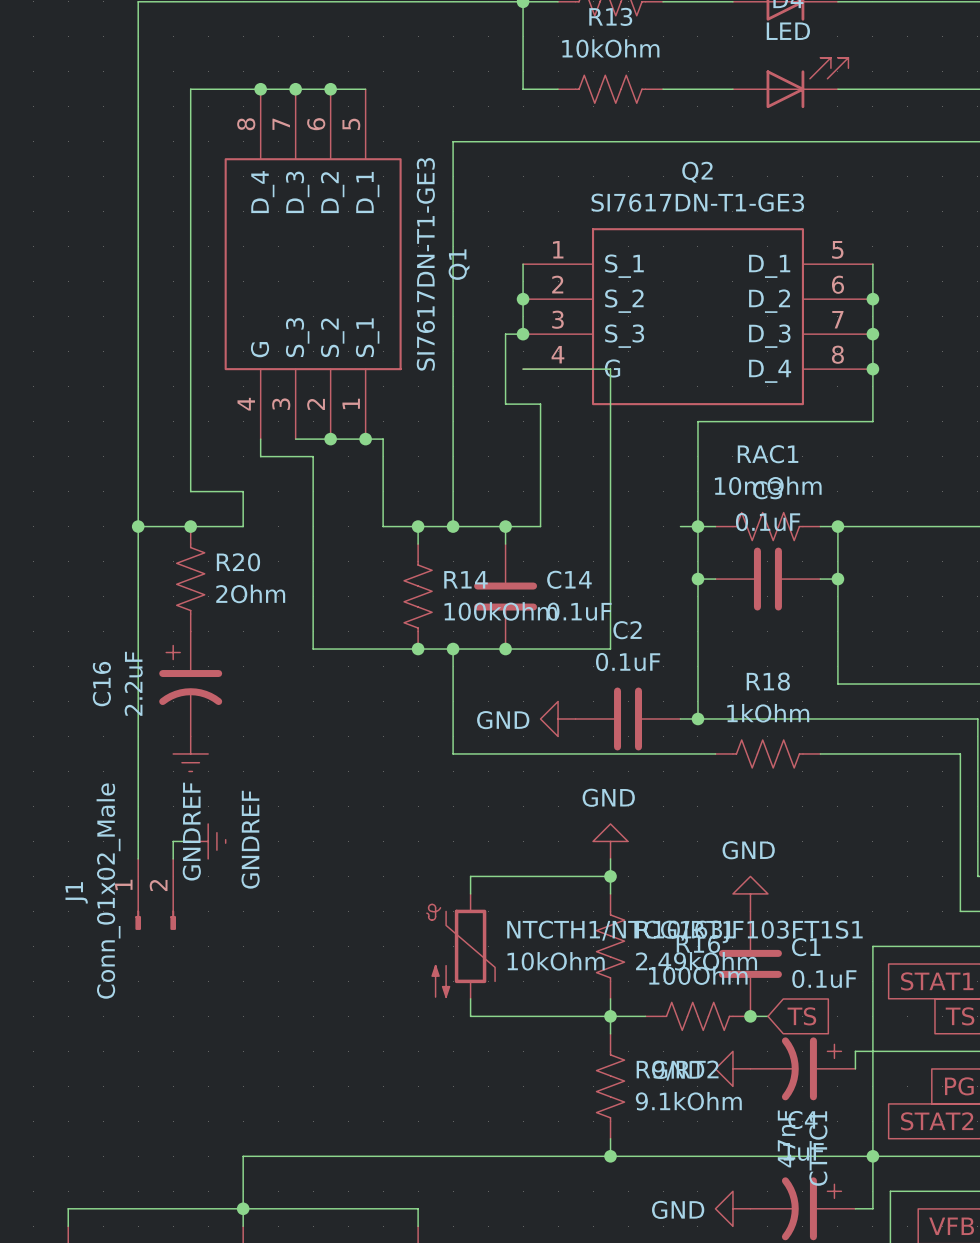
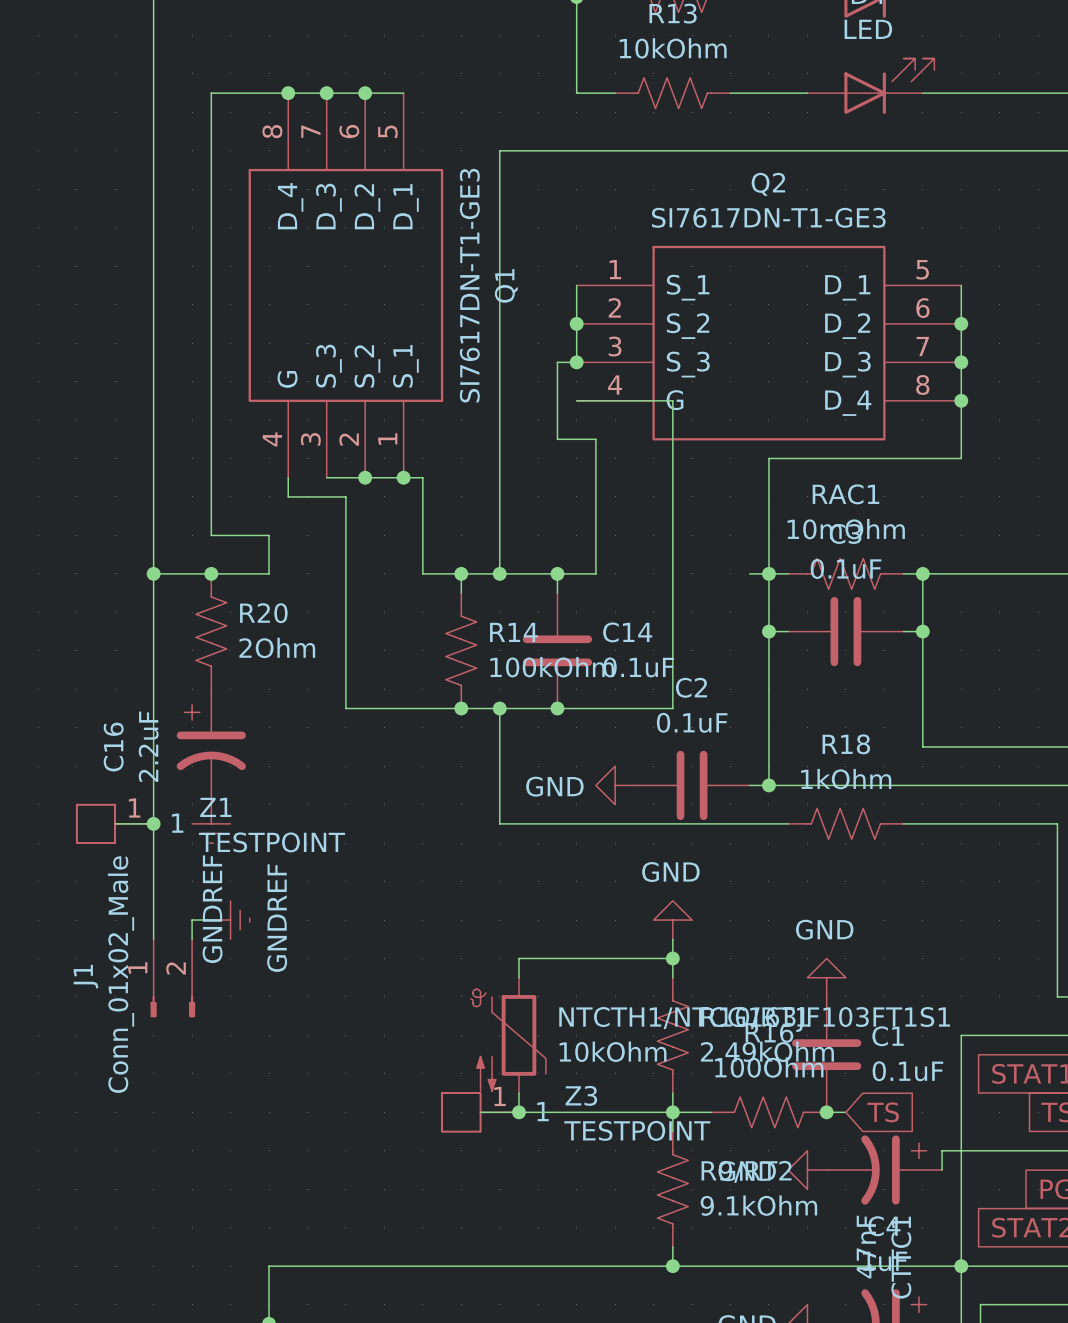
wire: none -> (115, 823) (153, 823)
Z1: none -> TESTPOINT (115, 823)
junction: none -> (153, 823)
wire: none -> (480, 1112) (518, 1112)
Z3: none -> TESTPOINT (480, 1112)
junction: none -> (518, 1112)

